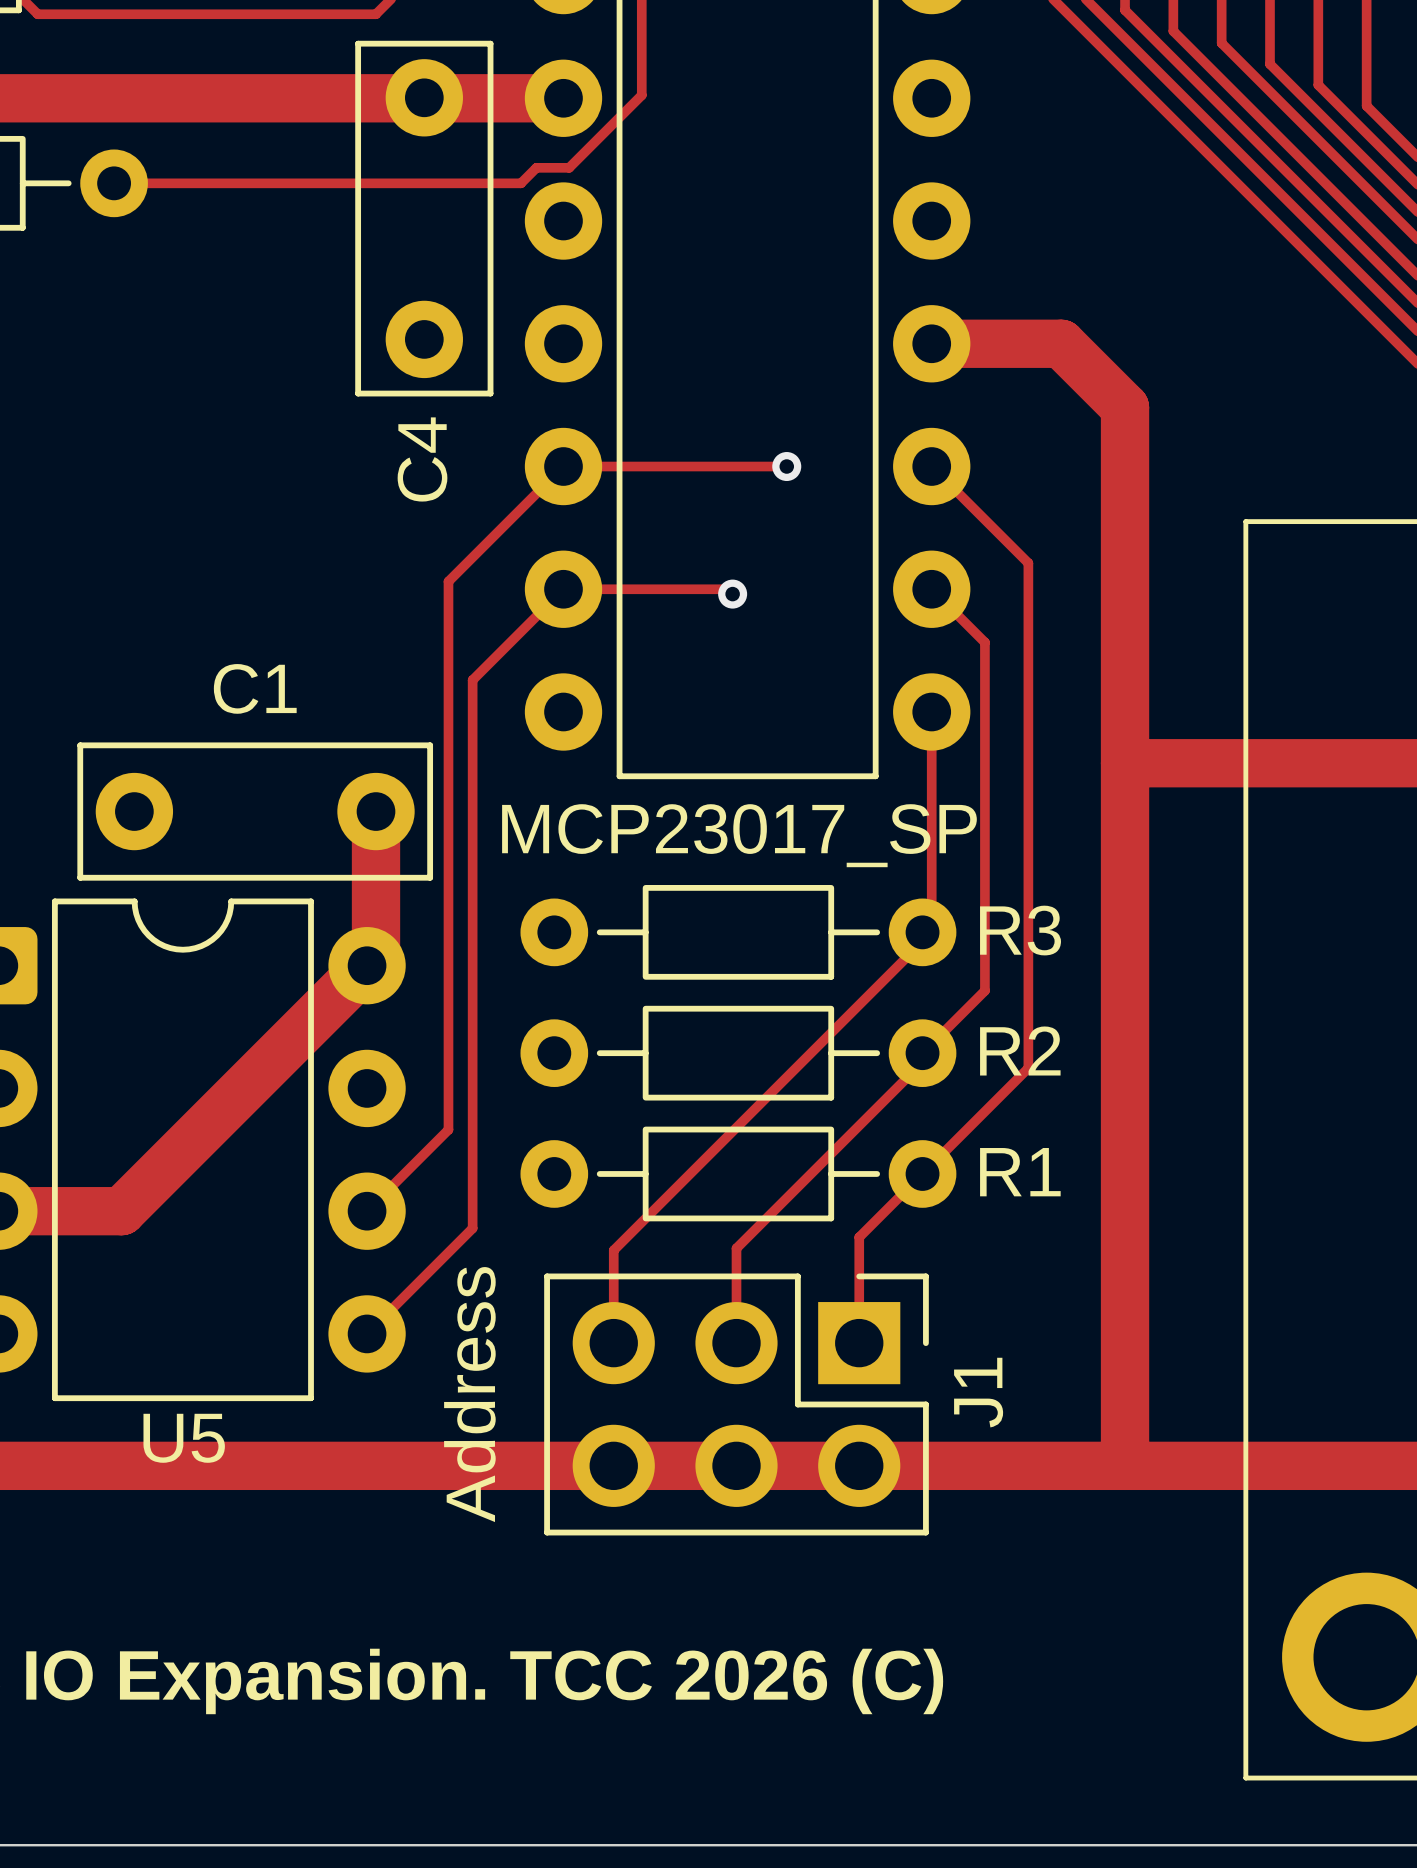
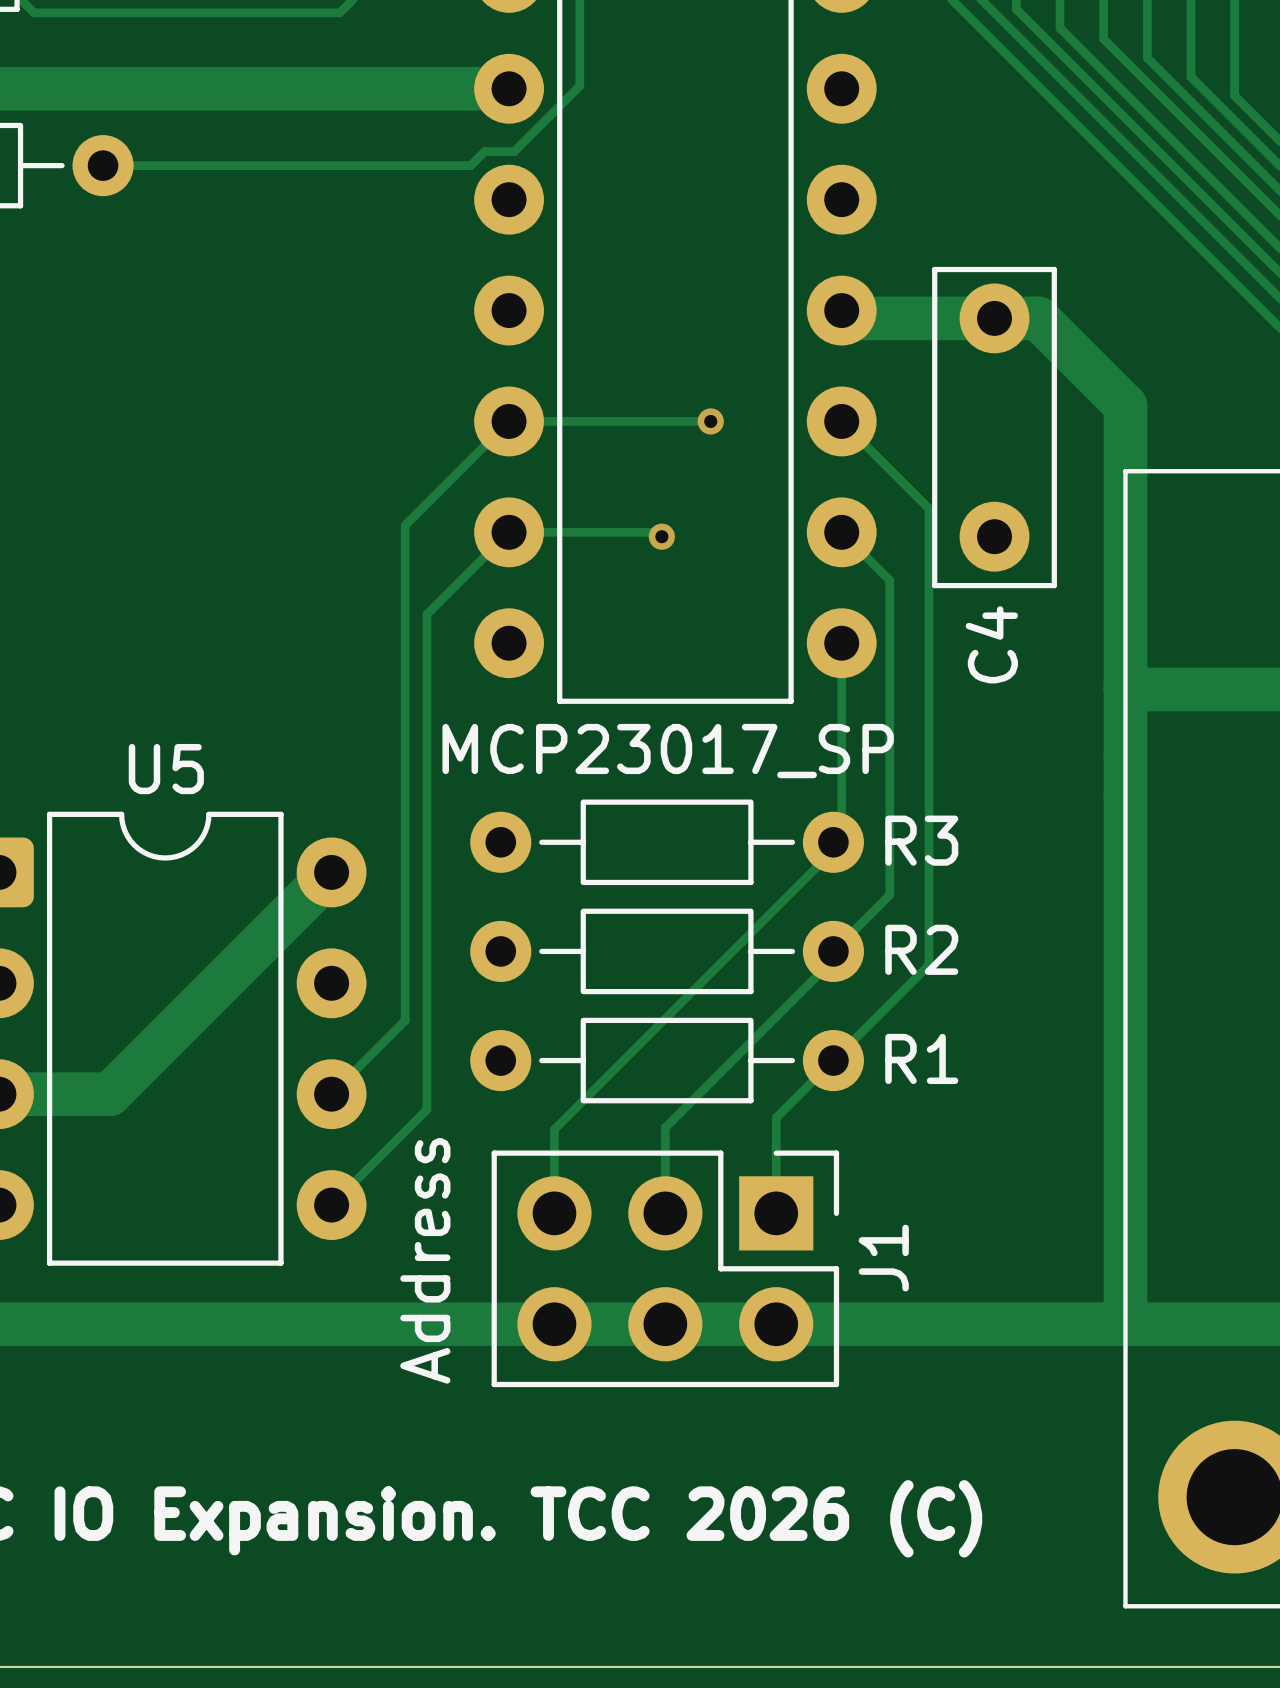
C4 position: (424, 218) -> (994, 427)
track: (931, 343) (1061, 343) (1125, 407) (1125, 1465) -> (841, 310) (849, 318) (1038, 318) (1125, 405) (1125, 1322)
track: (1125, 763) (1245, 763) -> none
C1: (255, 811) -> none
track: (376, 811) (376, 956) (367, 965) -> none
U5 name position: U5 (184, 1438) -> U5 (166, 769)

